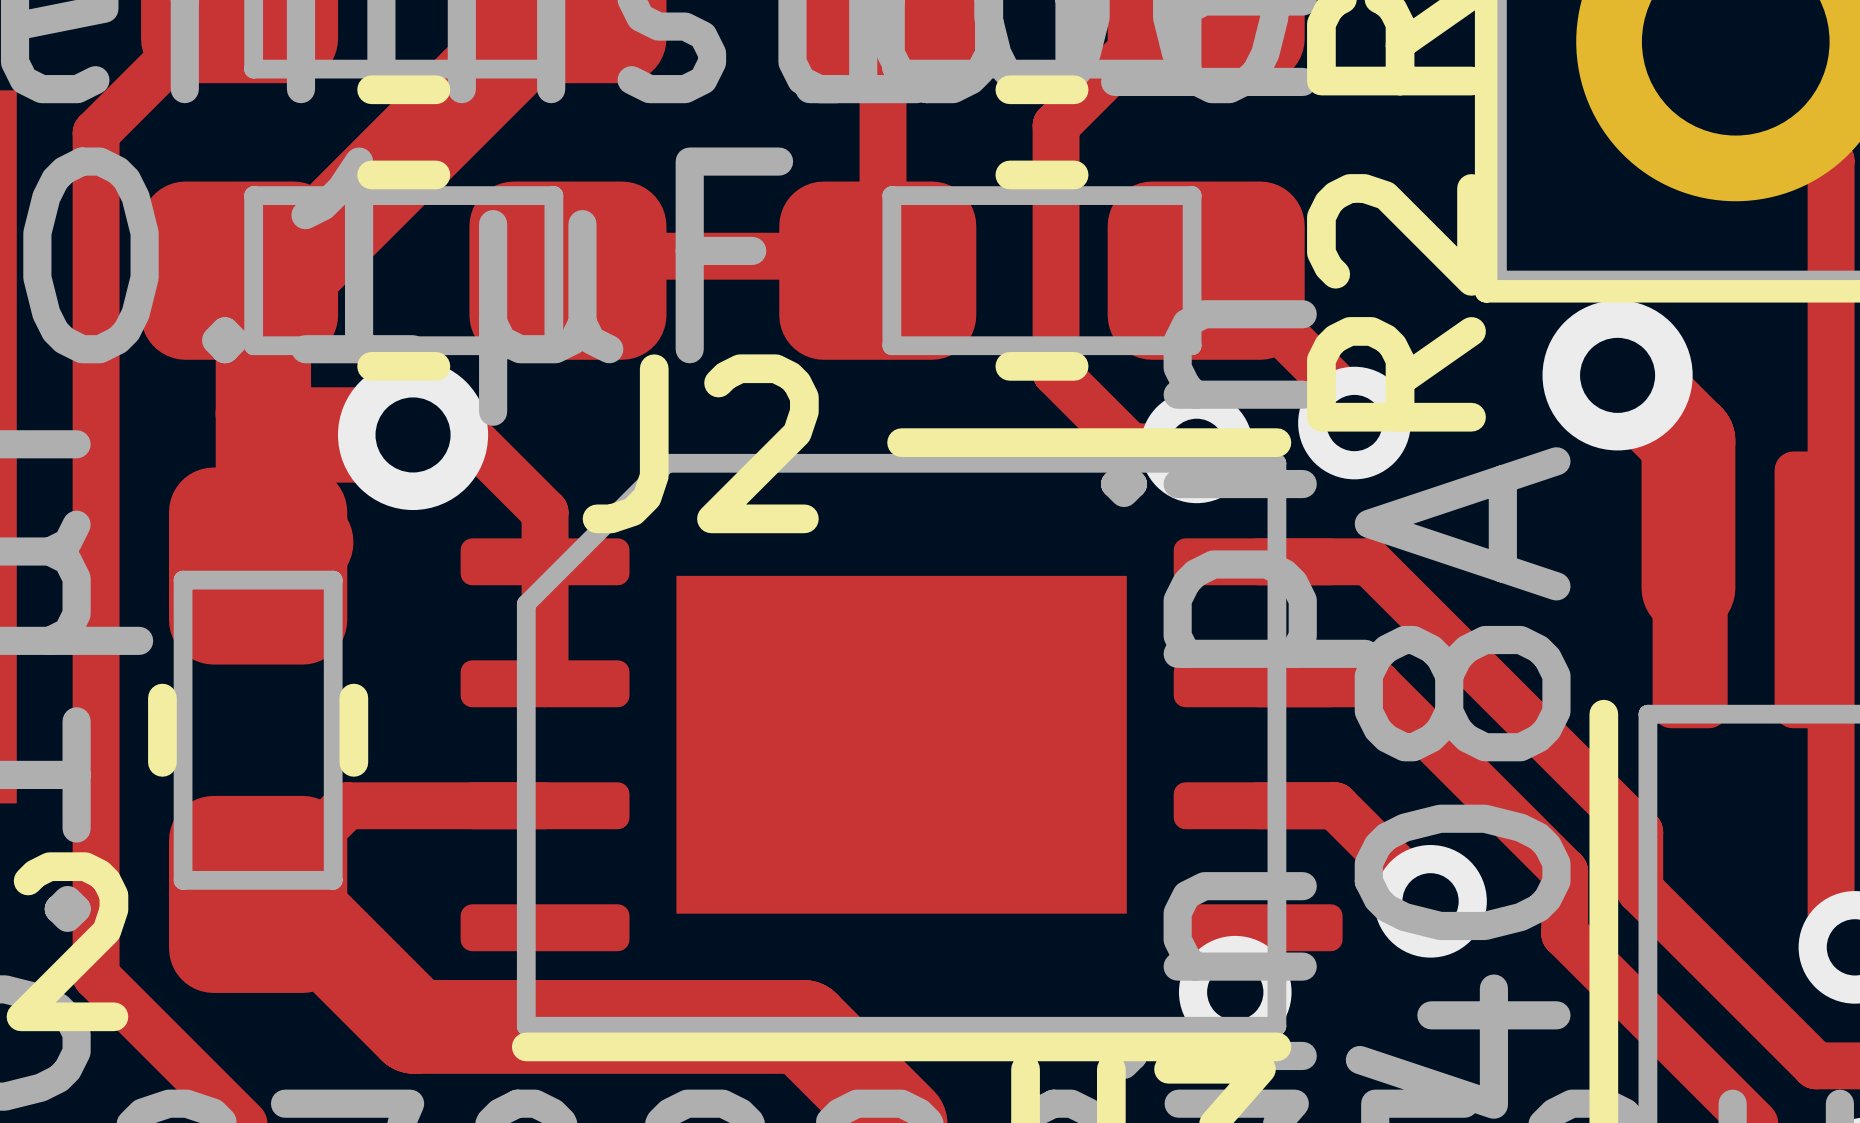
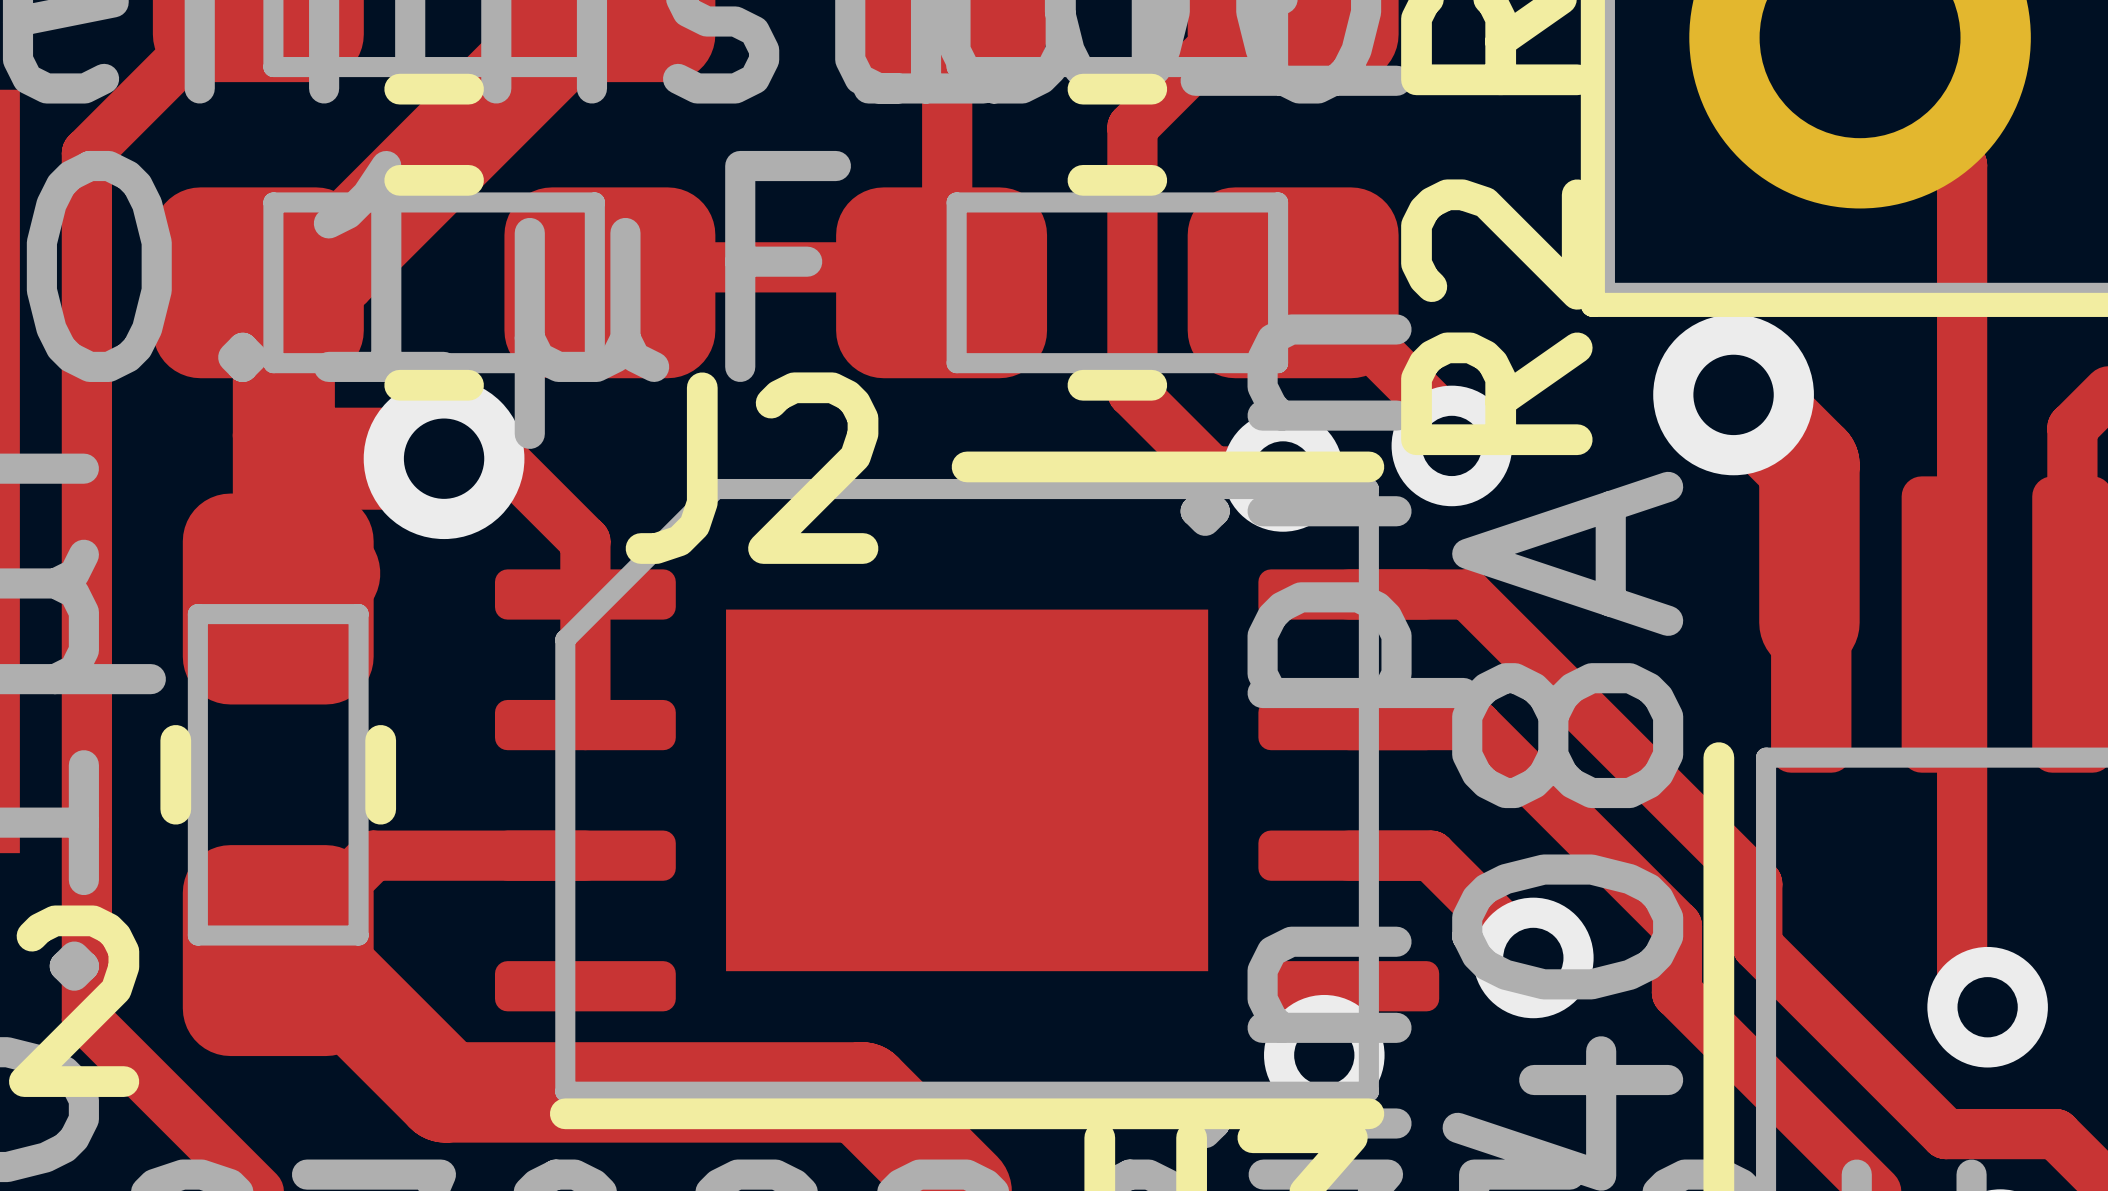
track: (96, 133) (96, 975) -> (104, 135) (86, 153) (86, 1019) (104, 1037)

